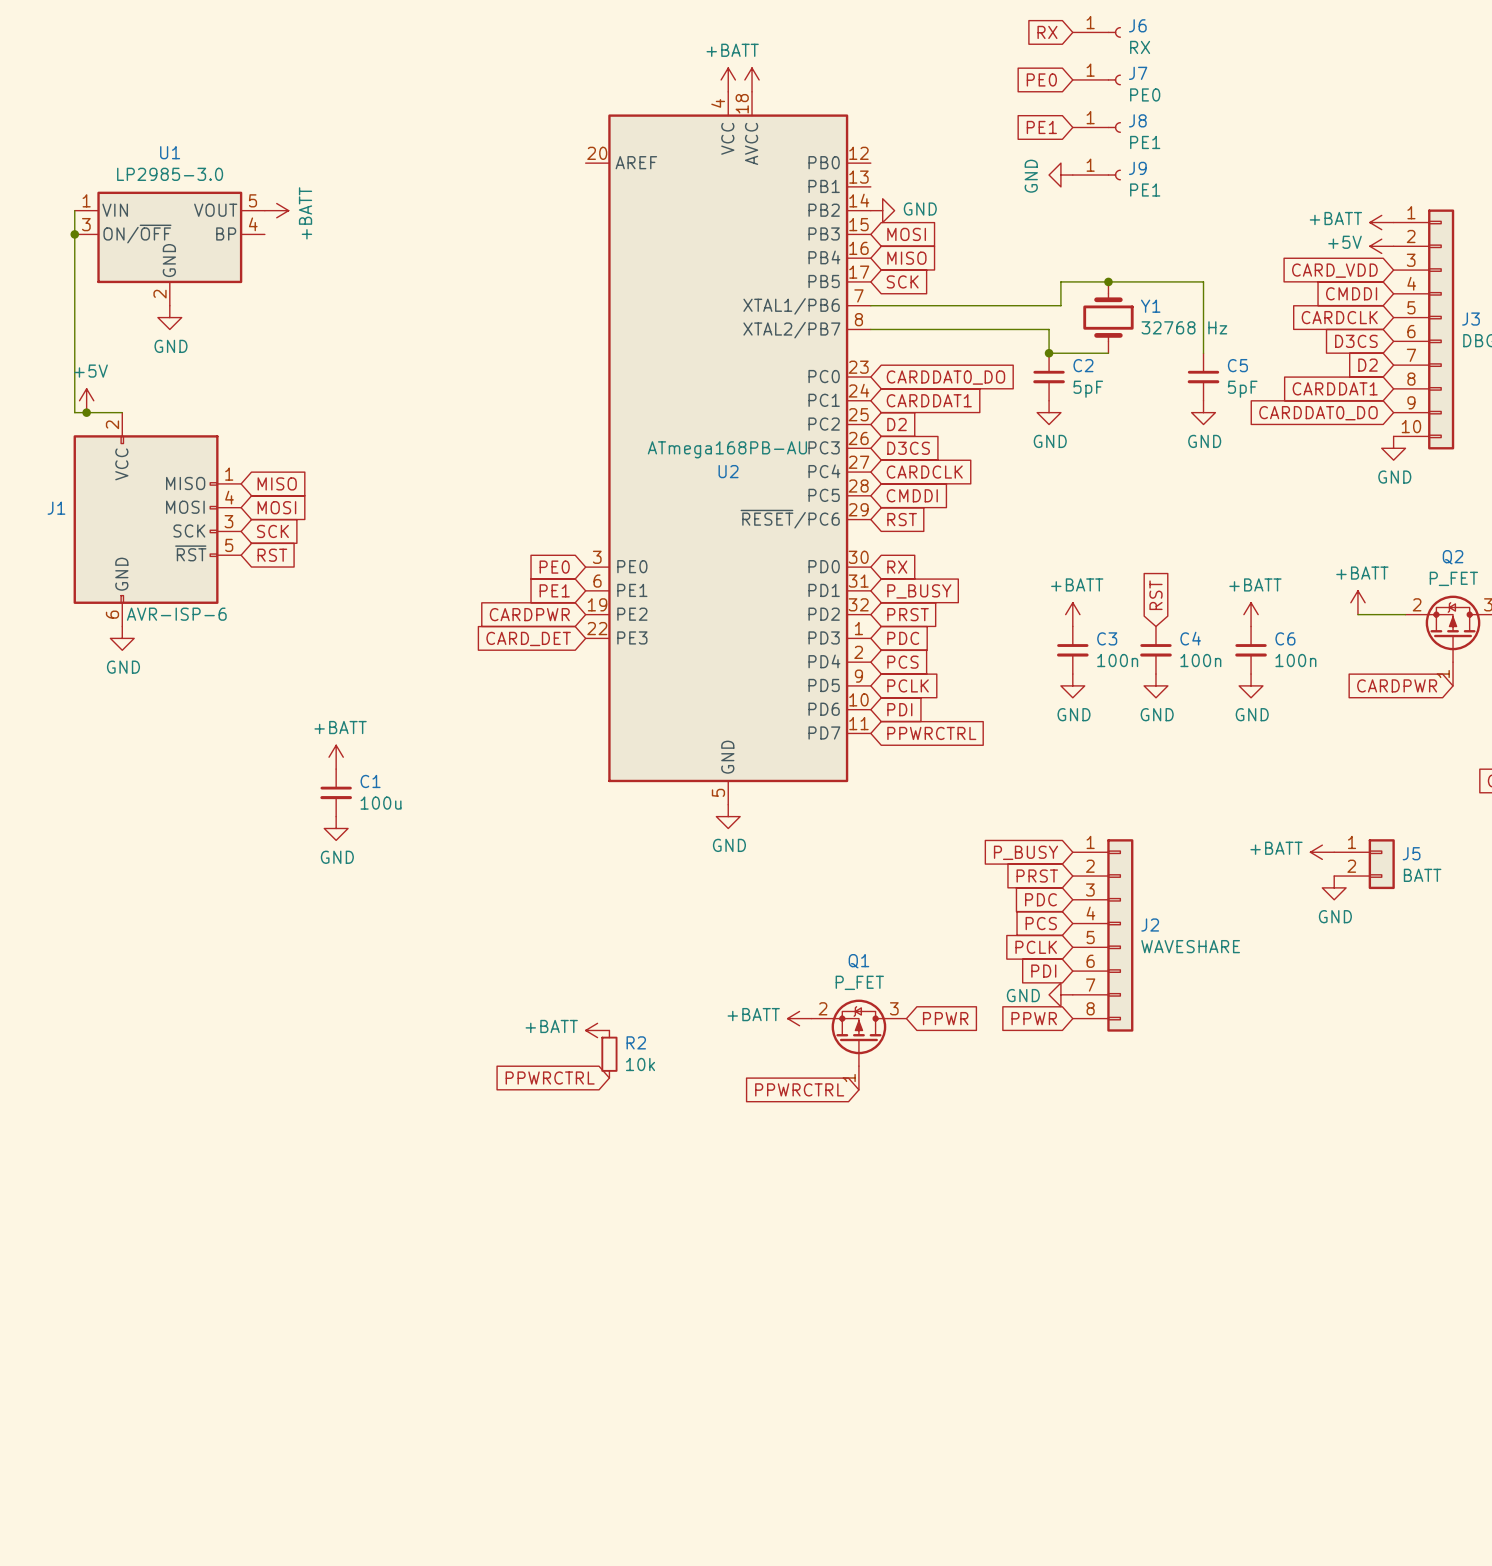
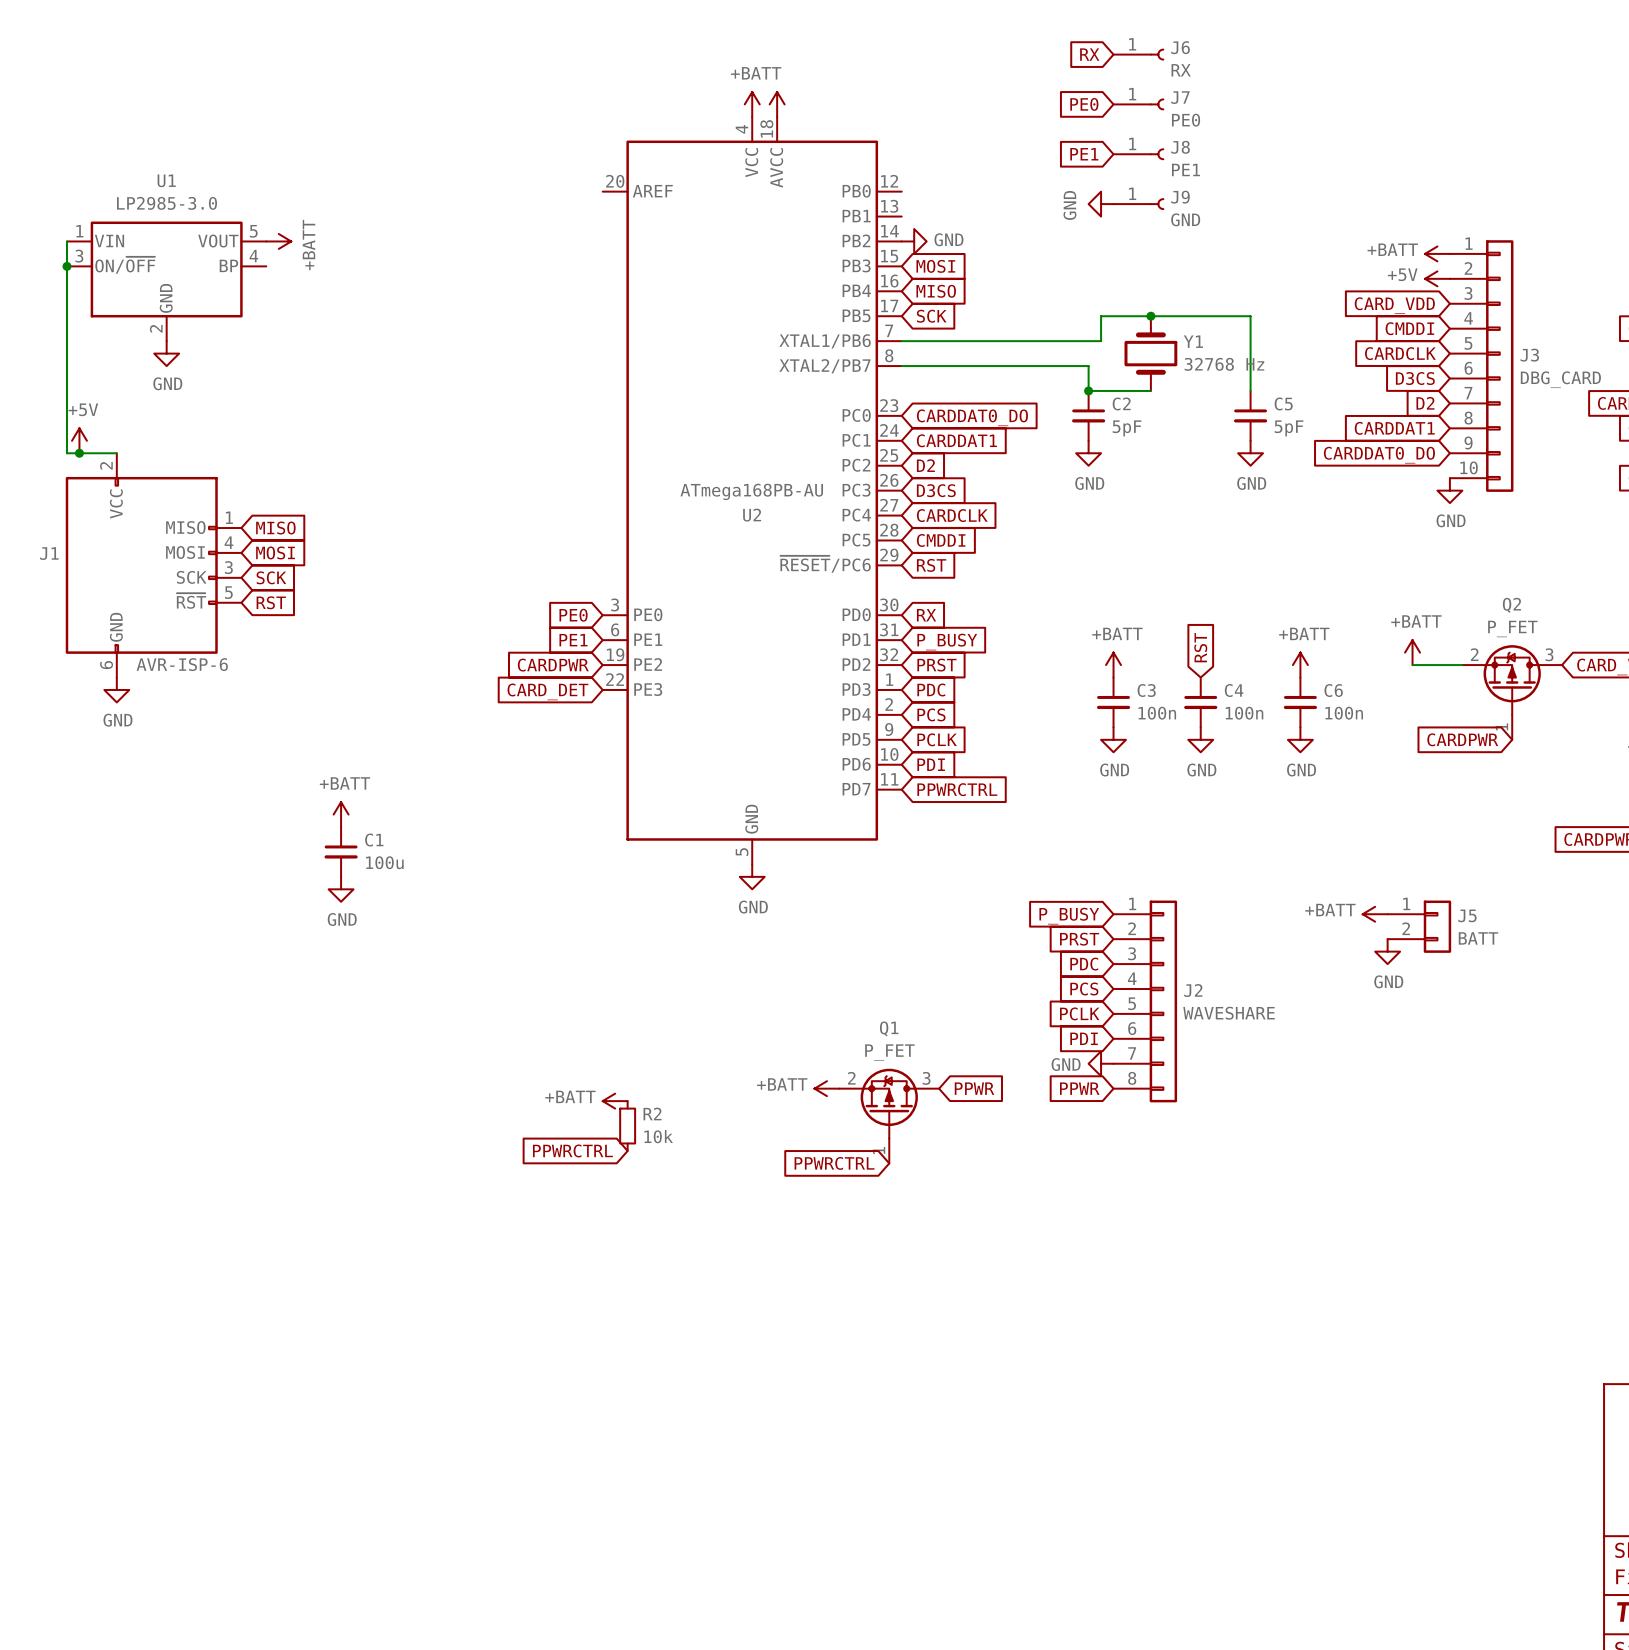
J9 value: PE1 (1145, 190) -> GND (1185, 219)

